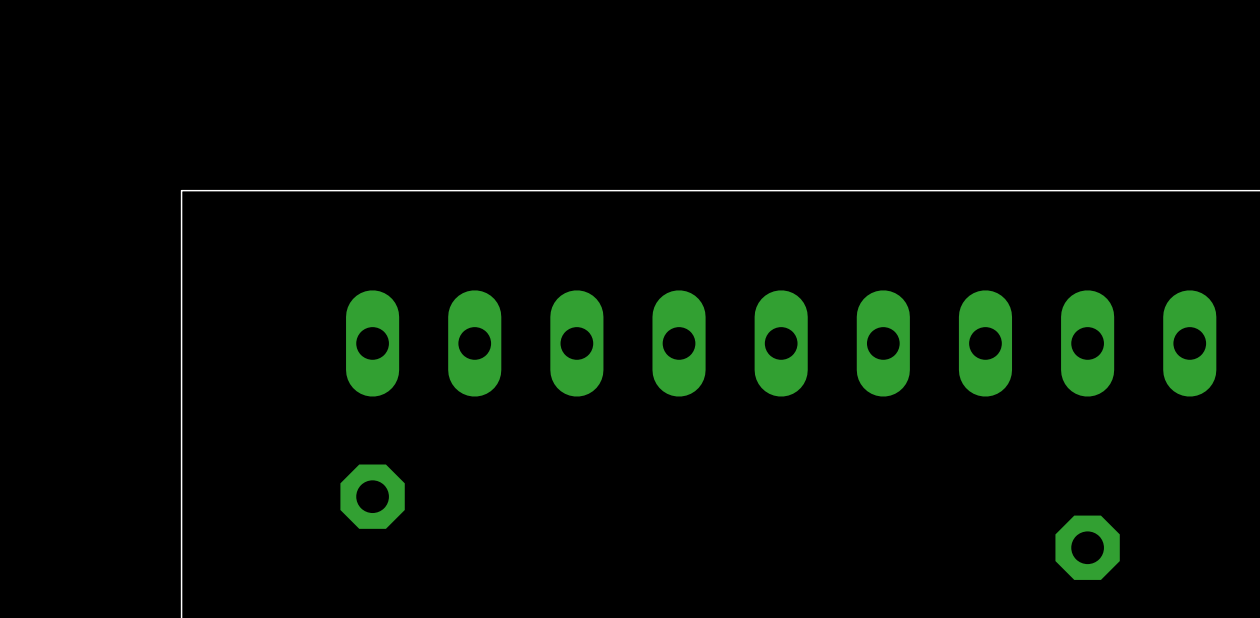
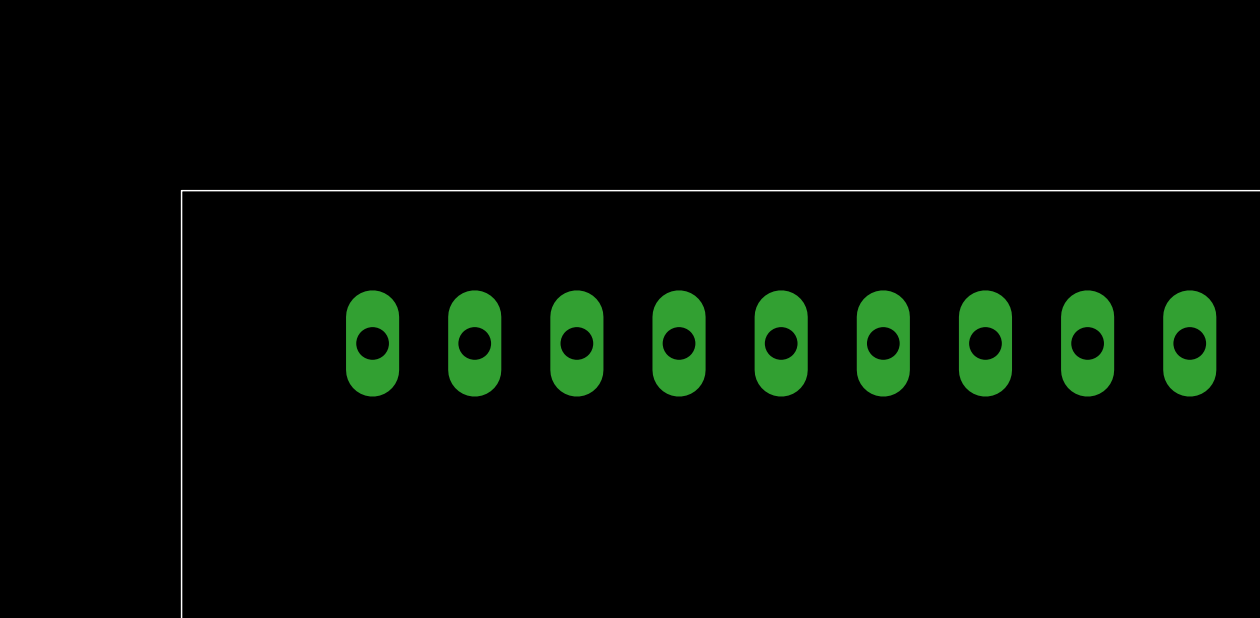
part: (372, 496) -> none
part: (1087, 547) -> none

